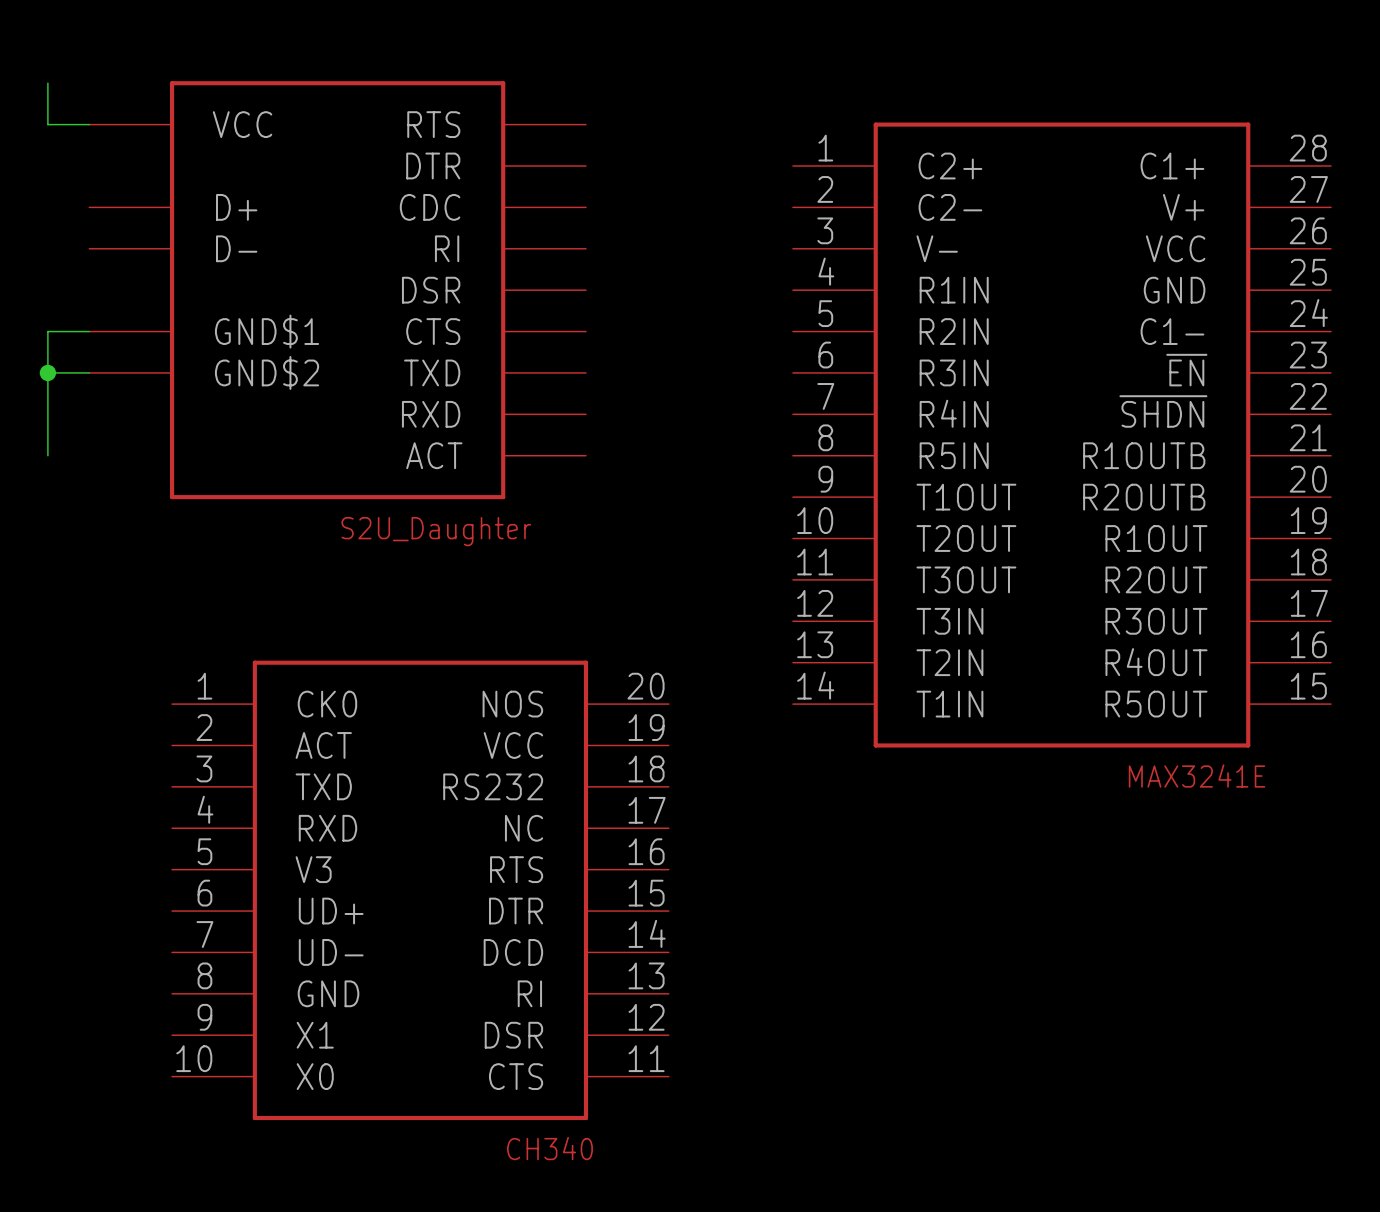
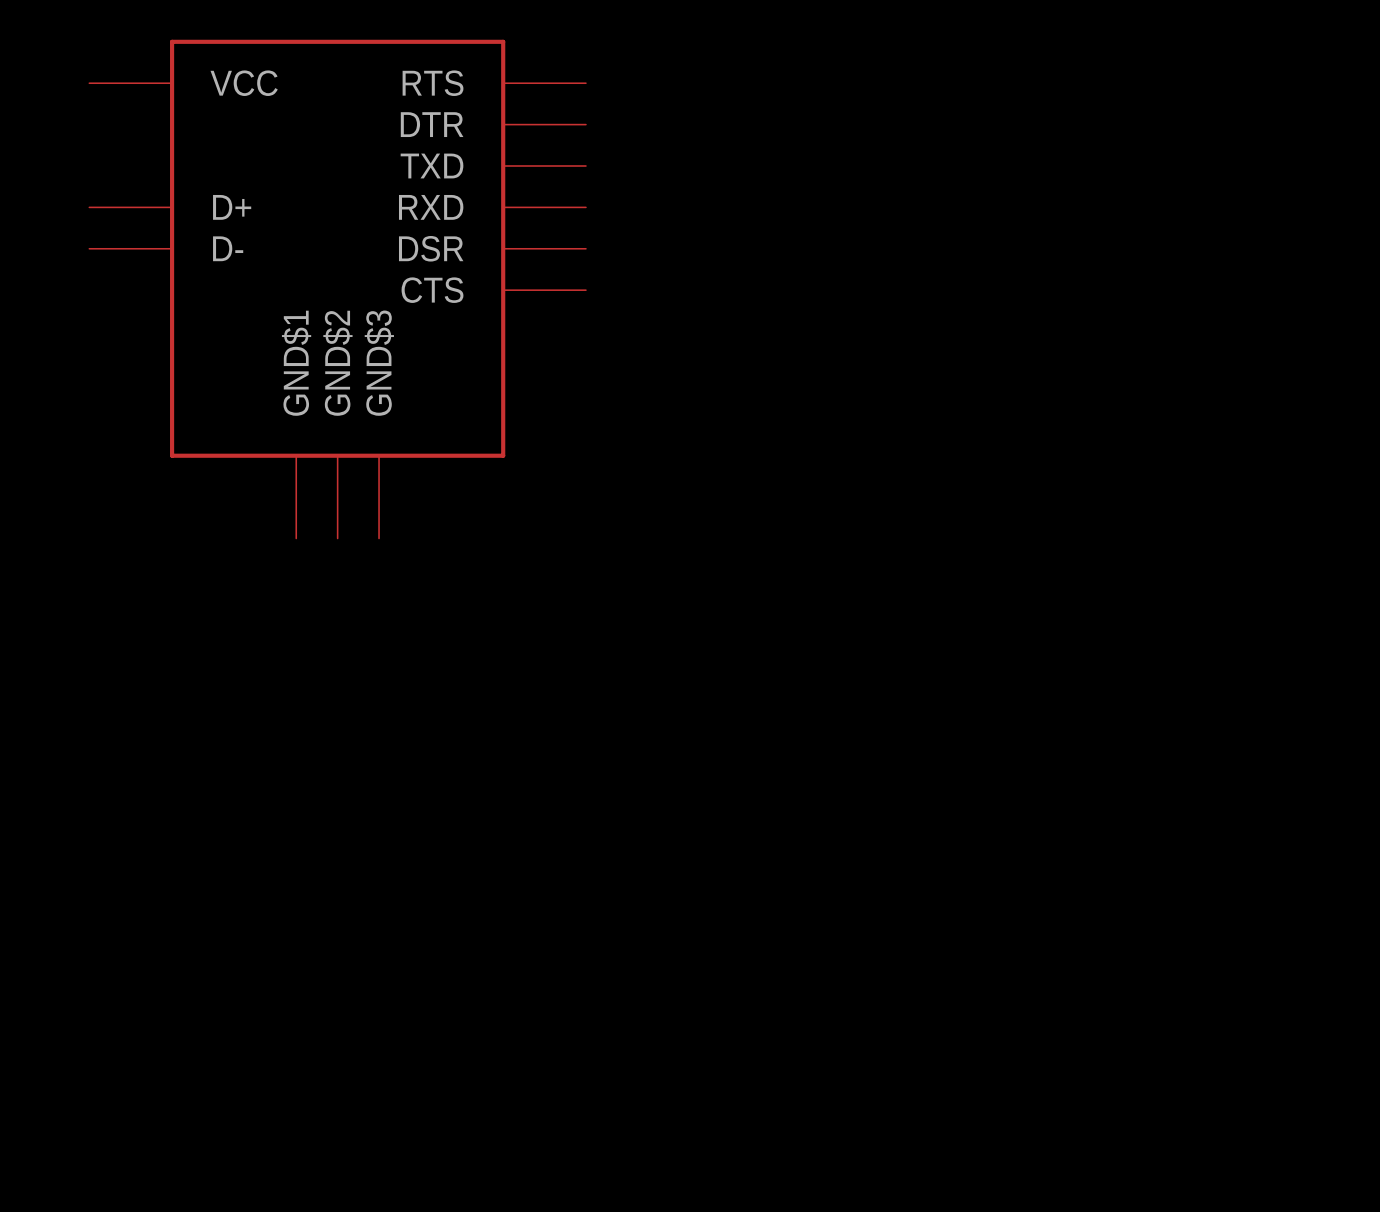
part symbol: [89, 81, 586, 500] -> [89, 39, 586, 539]
wire: (47, 83) (47, 124) (89, 124) -> none
wire: (89, 331) (47, 331) (47, 455) -> none
wire: (47, 372) (89, 372) -> none
junction: (47, 372) -> none
part: (1061, 435) -> none
part: (420, 890) -> none

